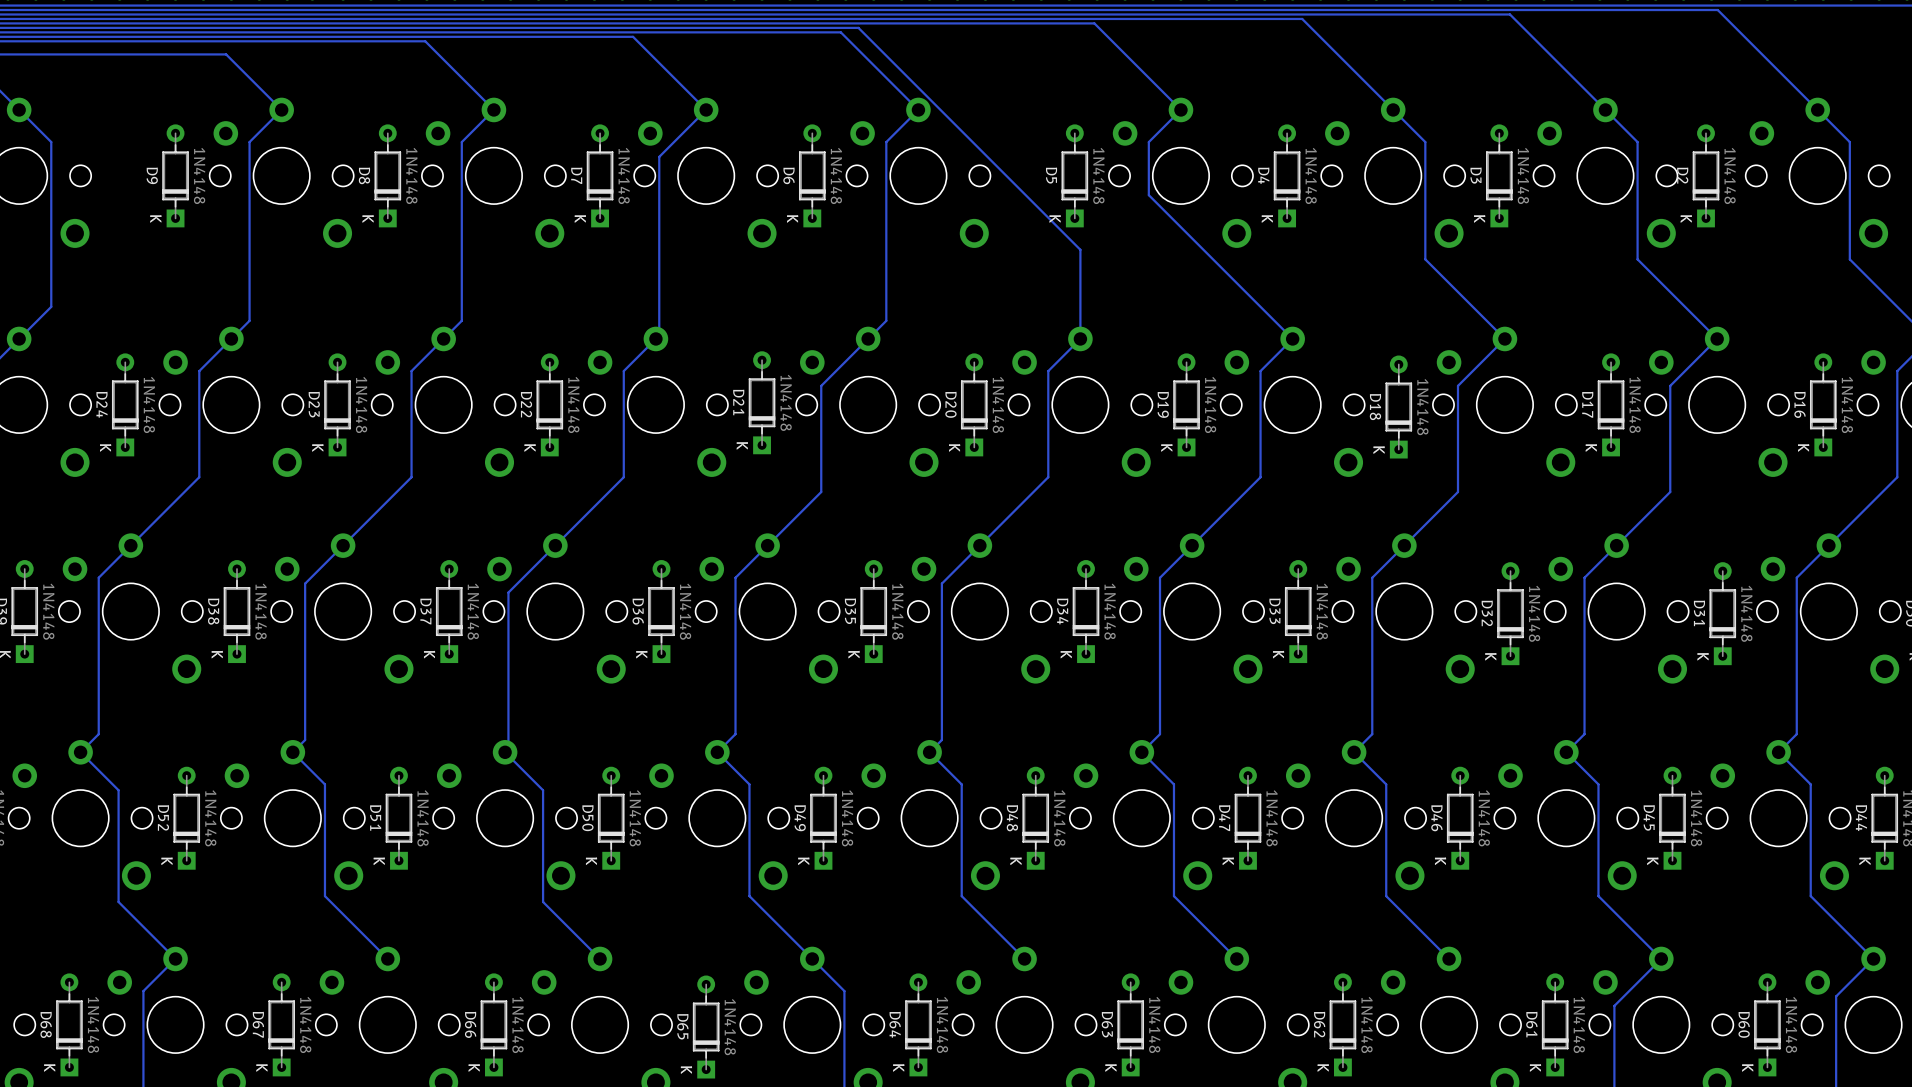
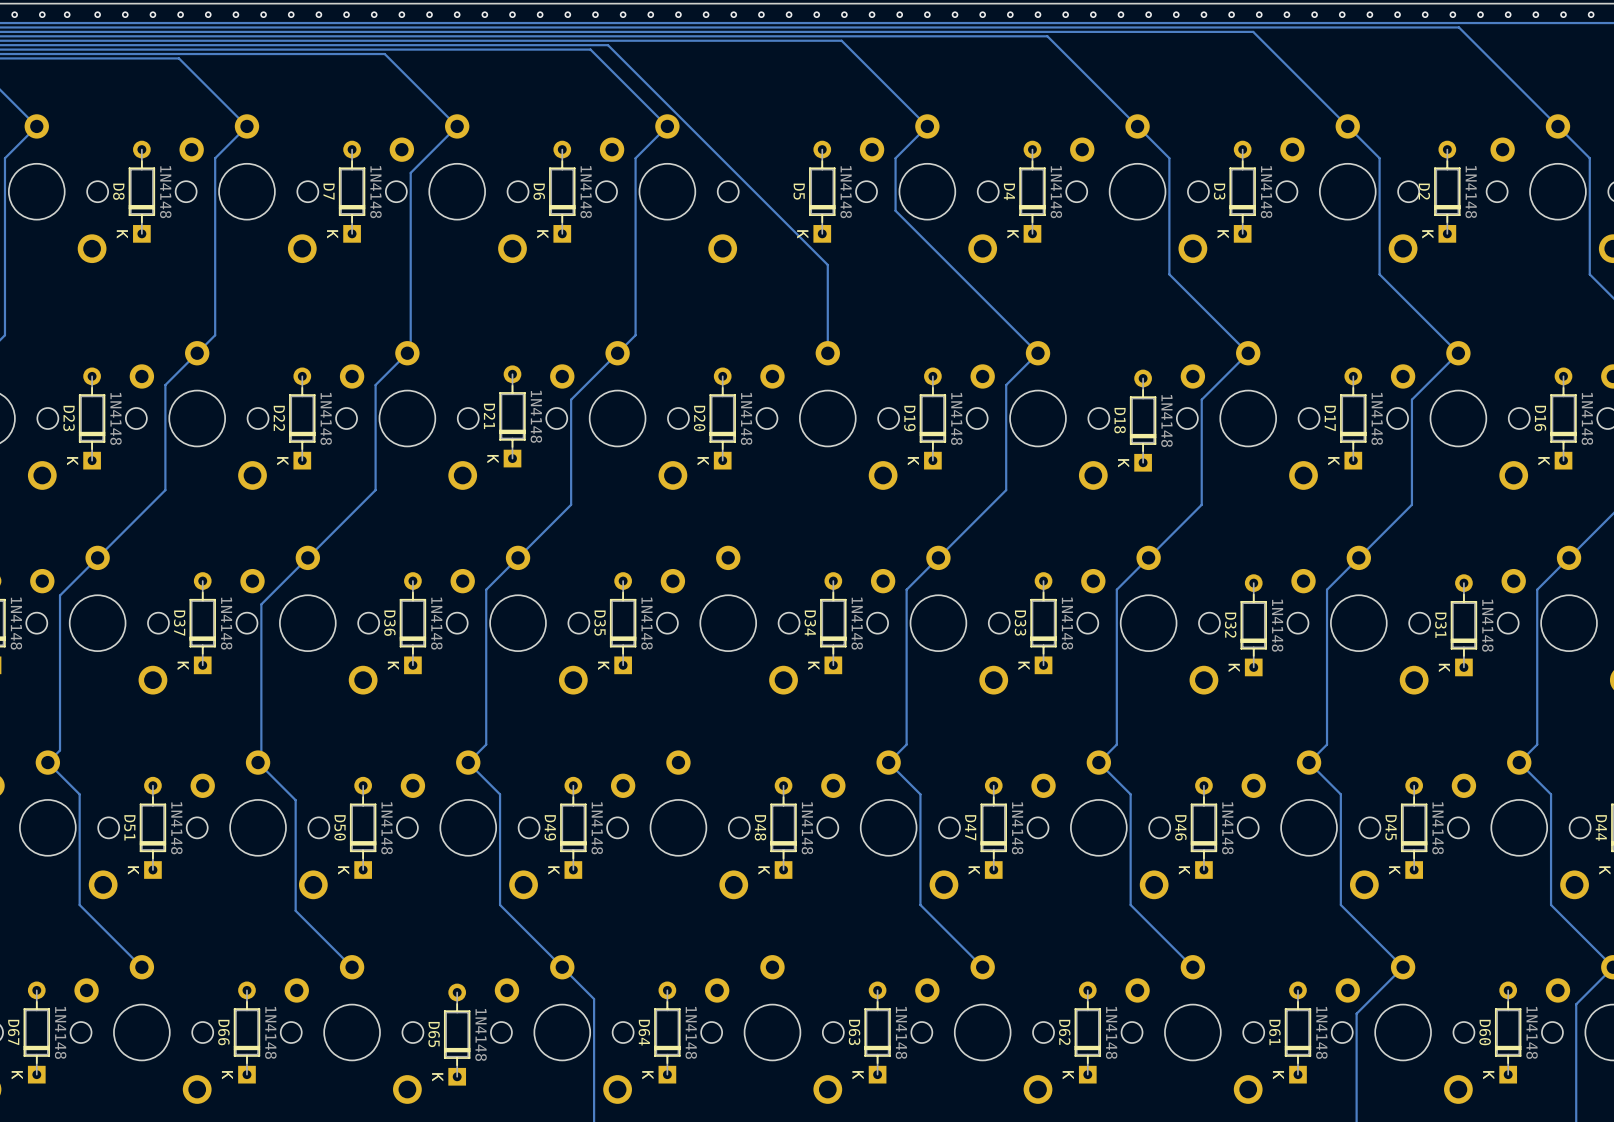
track: (1080, 338) (1048, 371) (1048, 477) (941, 583) (941, 740) (929, 752) (961, 784) (961, 896) (1024, 958) -> none

